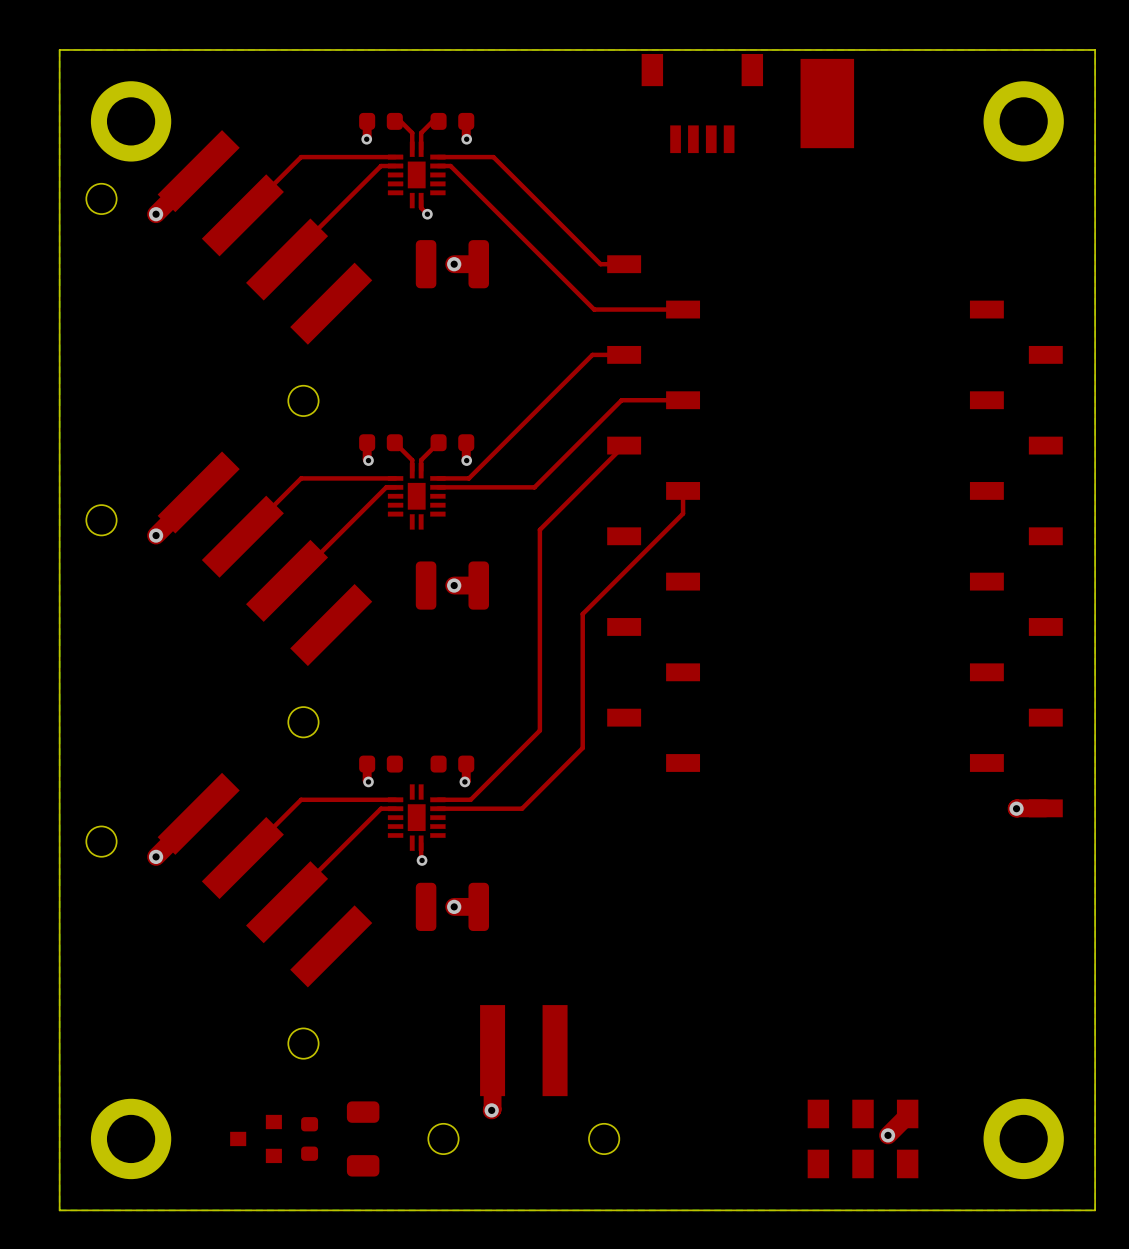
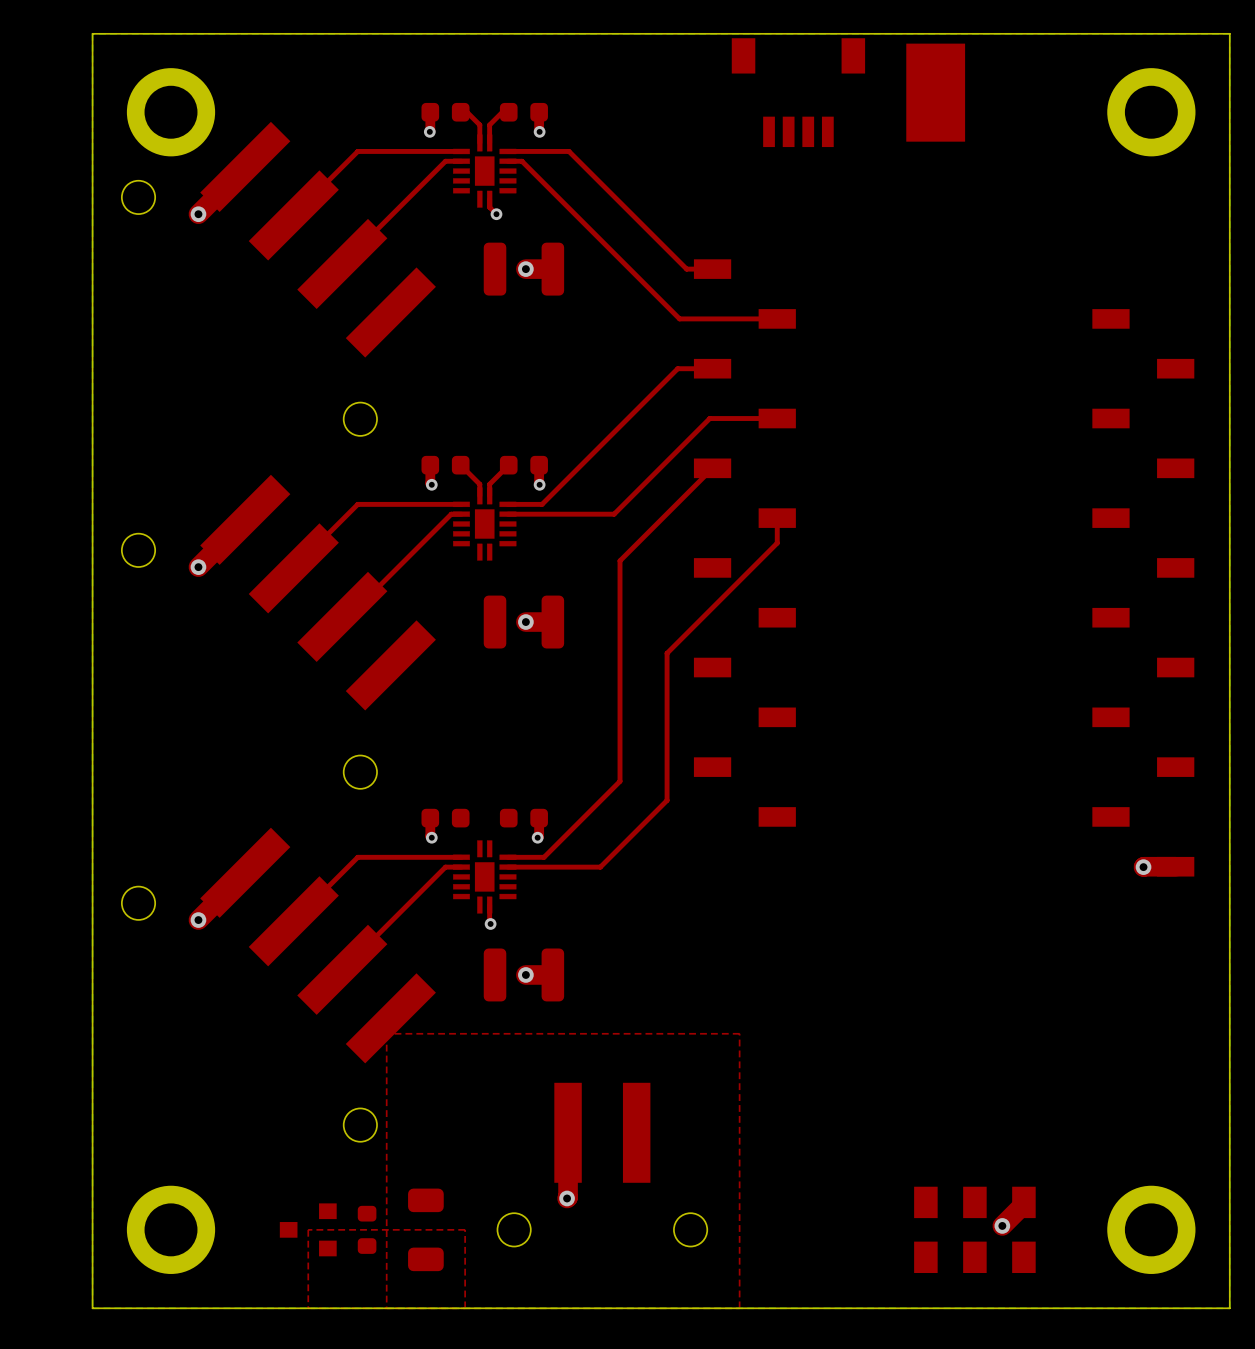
top zone outline: none -> (465, 1308) (465, 1229) (308, 1229) (308, 1308) (739, 1308) (739, 1033) (386, 1033) (386, 1308)

